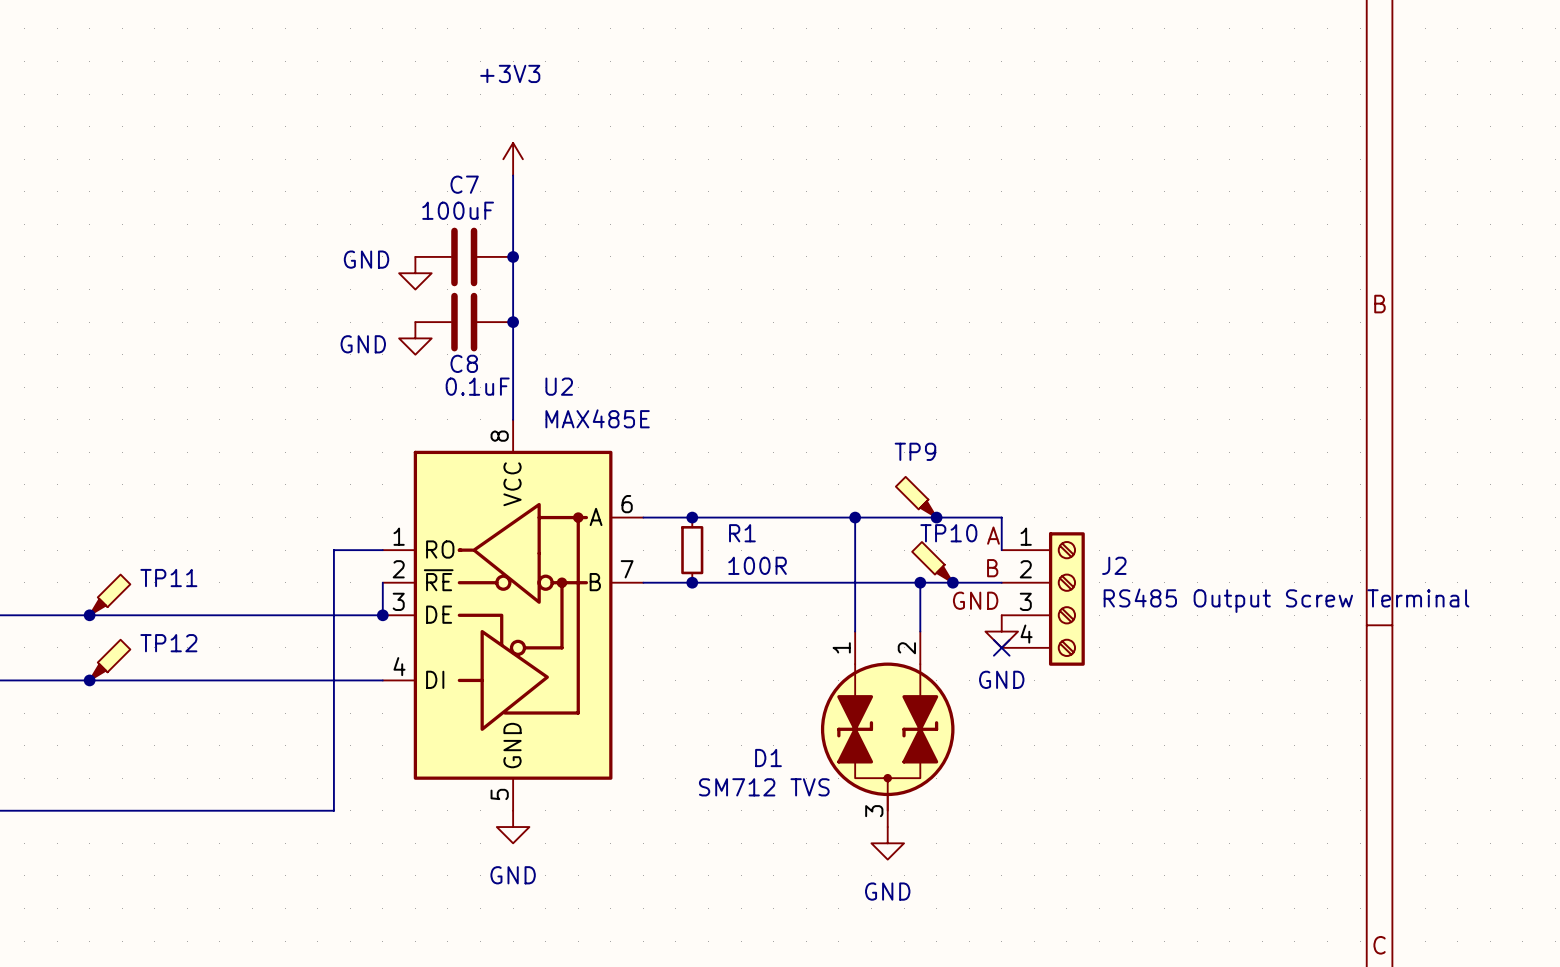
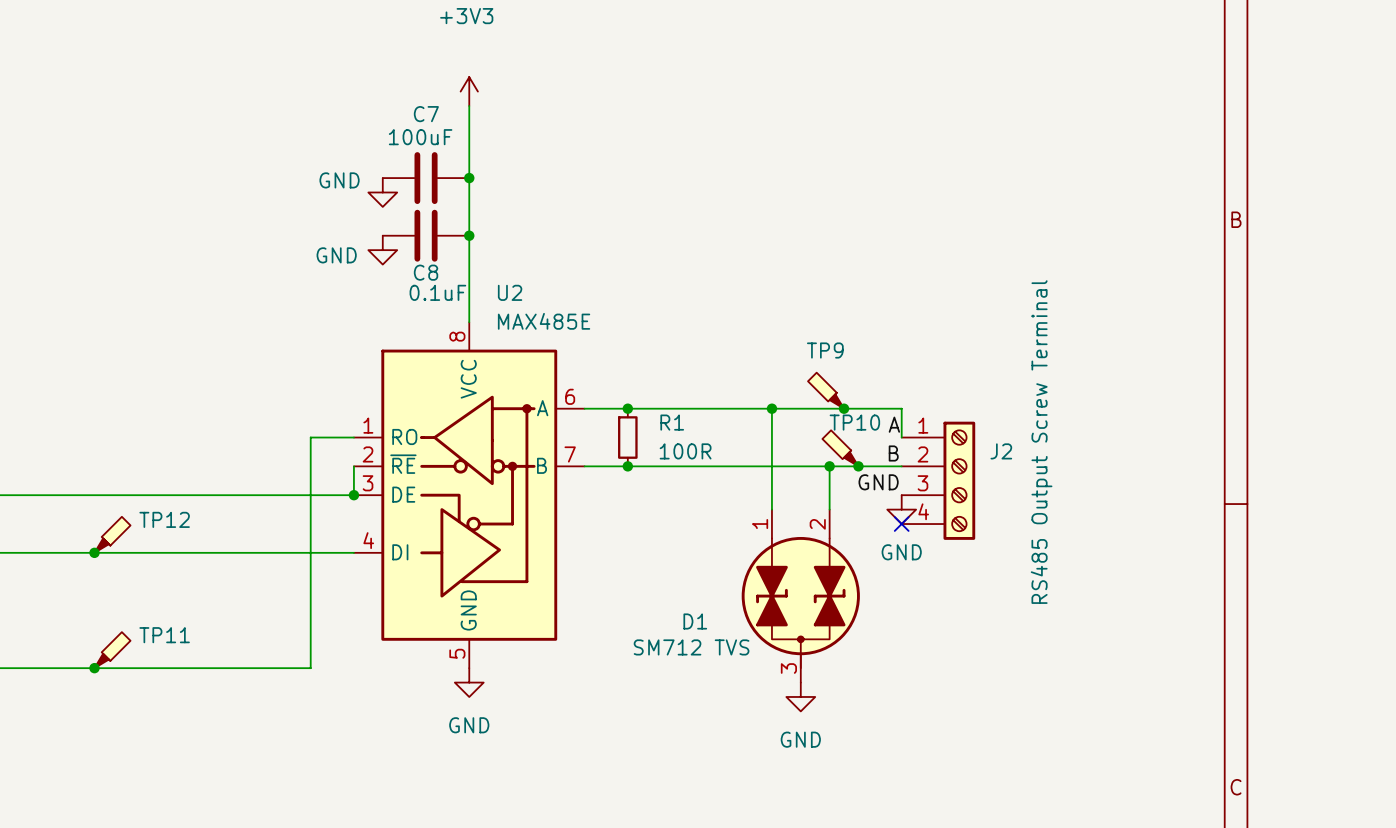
TP11 position: (109, 594) -> (112, 650)
J2 value rotation: 0° (1286, 600) -> 90° counterclockwise (1041, 442)
junction: (89, 615) -> none
junction: none -> (94, 668)

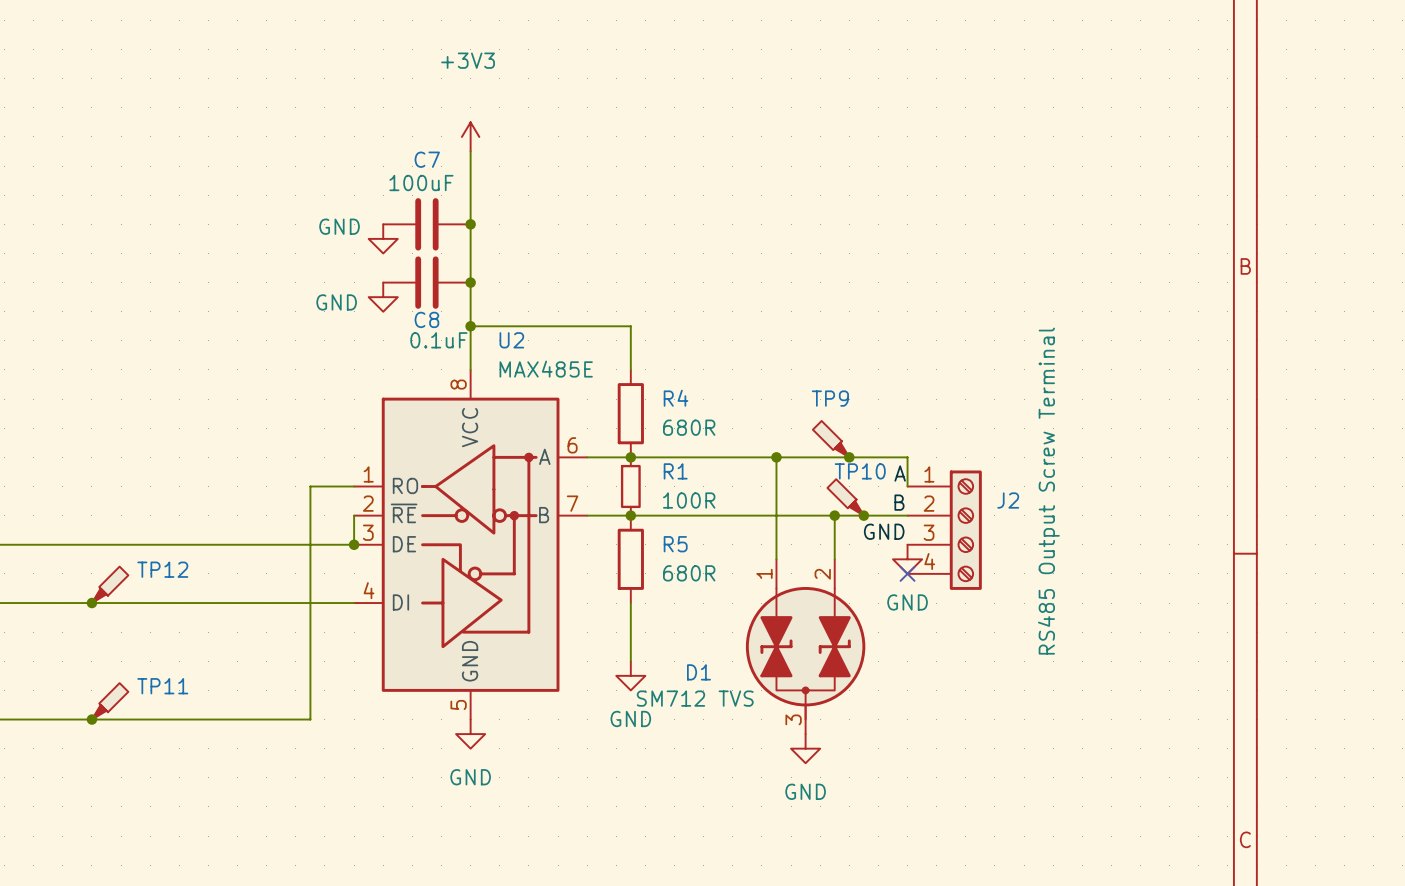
wire: none -> (470, 326) (630, 326) (630, 369)
junction: none -> (470, 326)
R4: none -> 680R (630, 413)
R5: none -> 680R (630, 559)
wire: none -> (630, 603) (630, 661)
power symbol: none -> GND (630, 675)

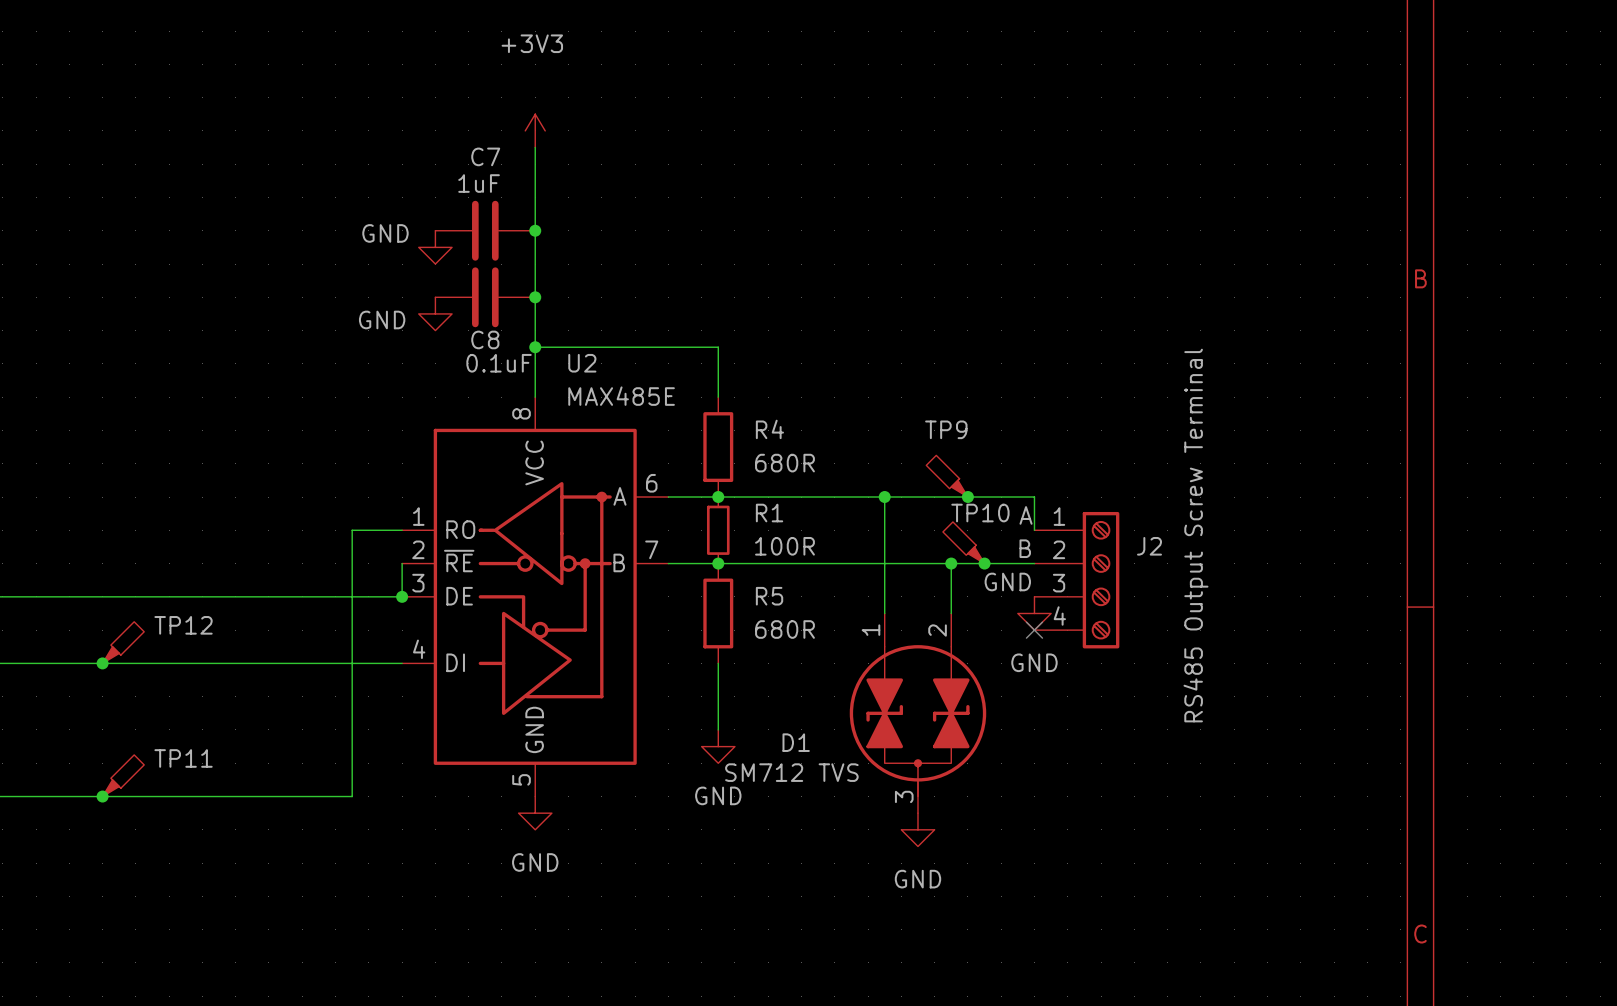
C7 value: 100uF (421, 183) -> 1uF (479, 183)

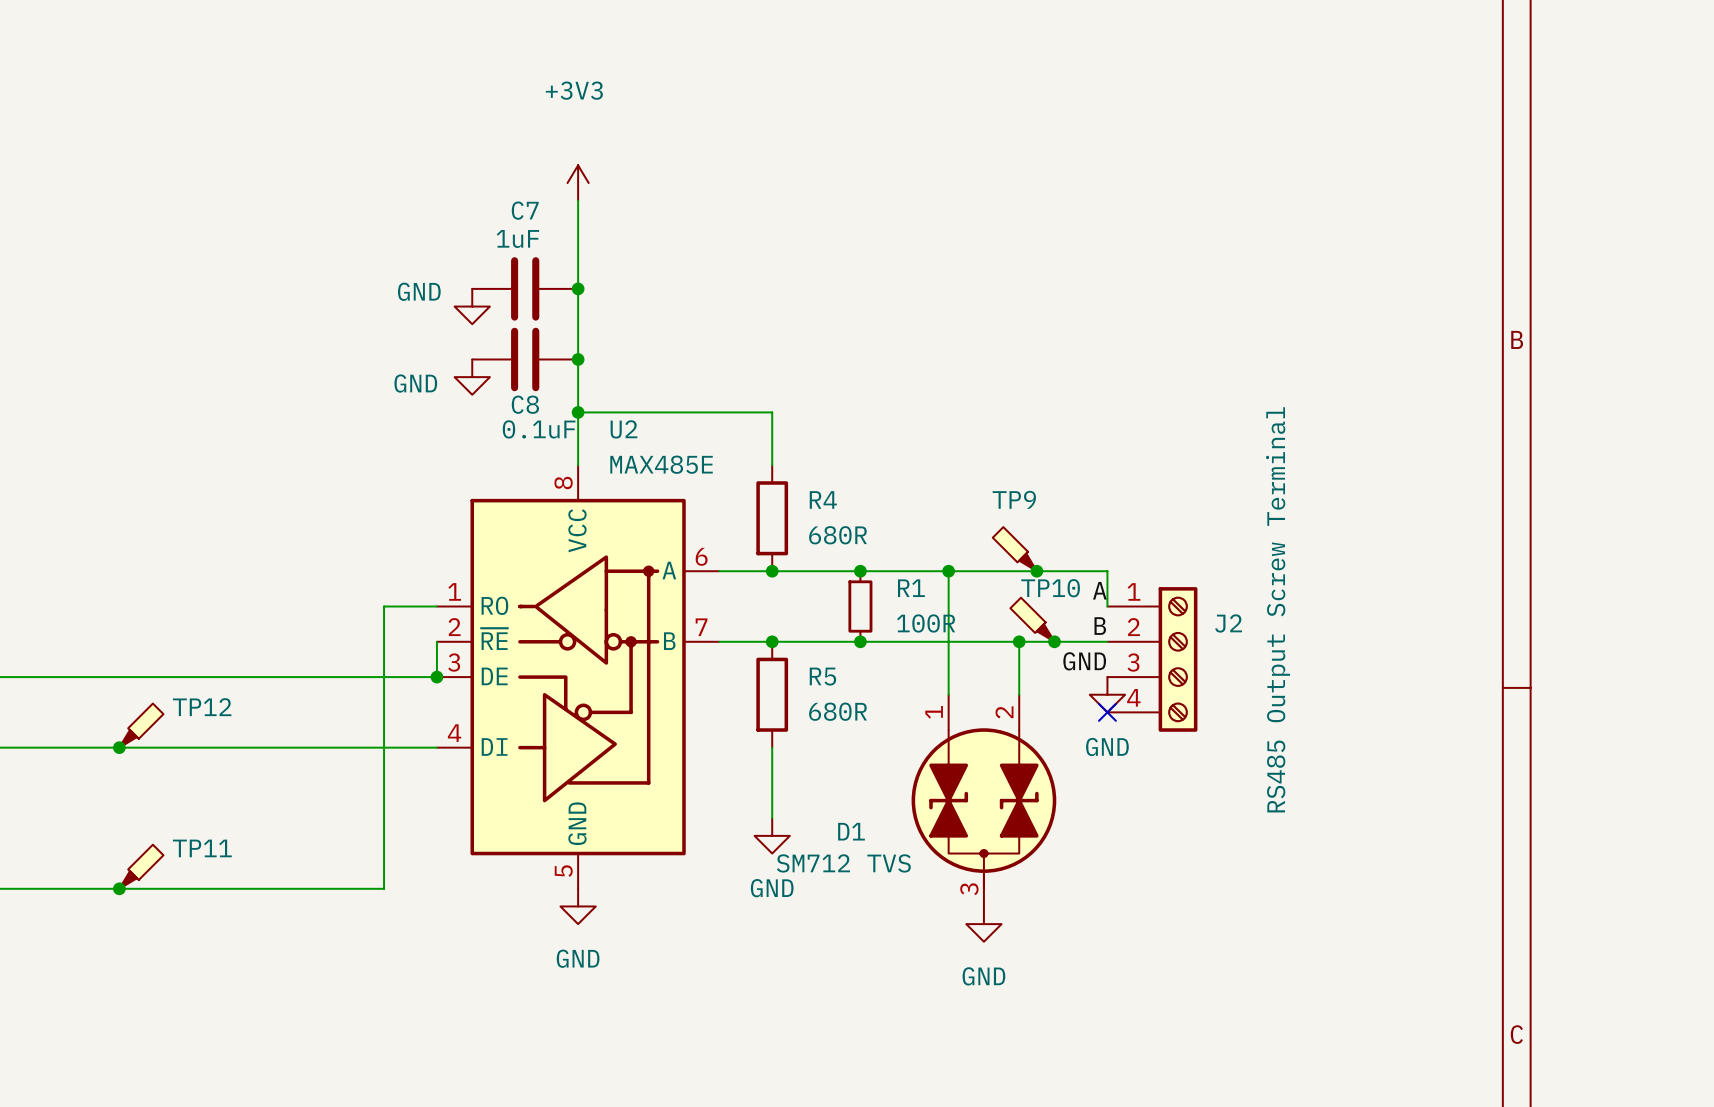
junction: none -> (860, 571)
R1 position: (718, 530) -> (860, 606)
junction: none -> (860, 641)

